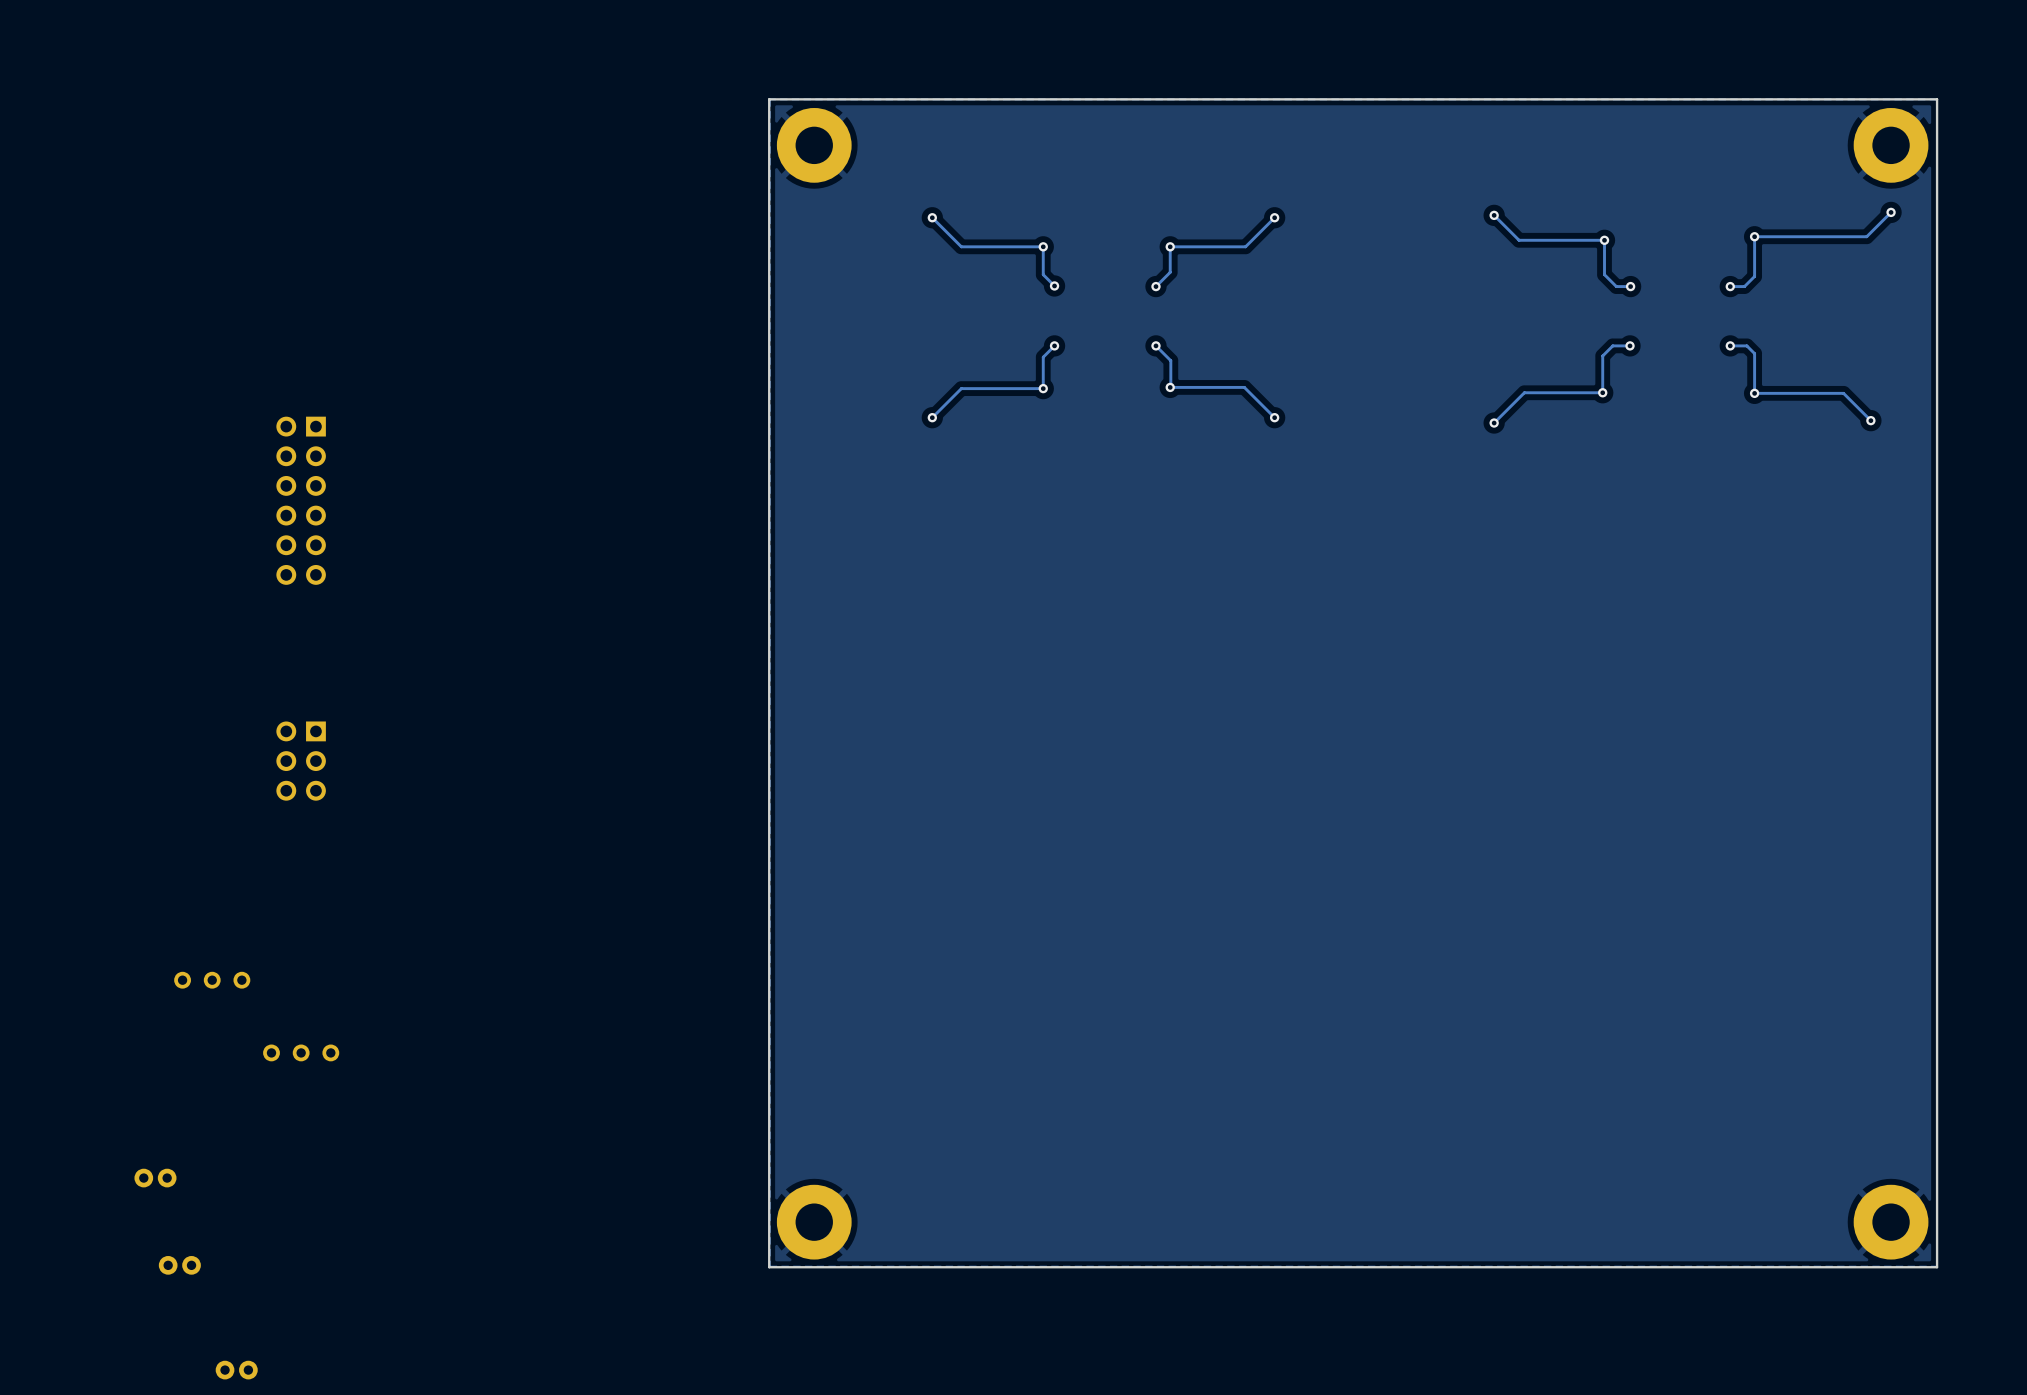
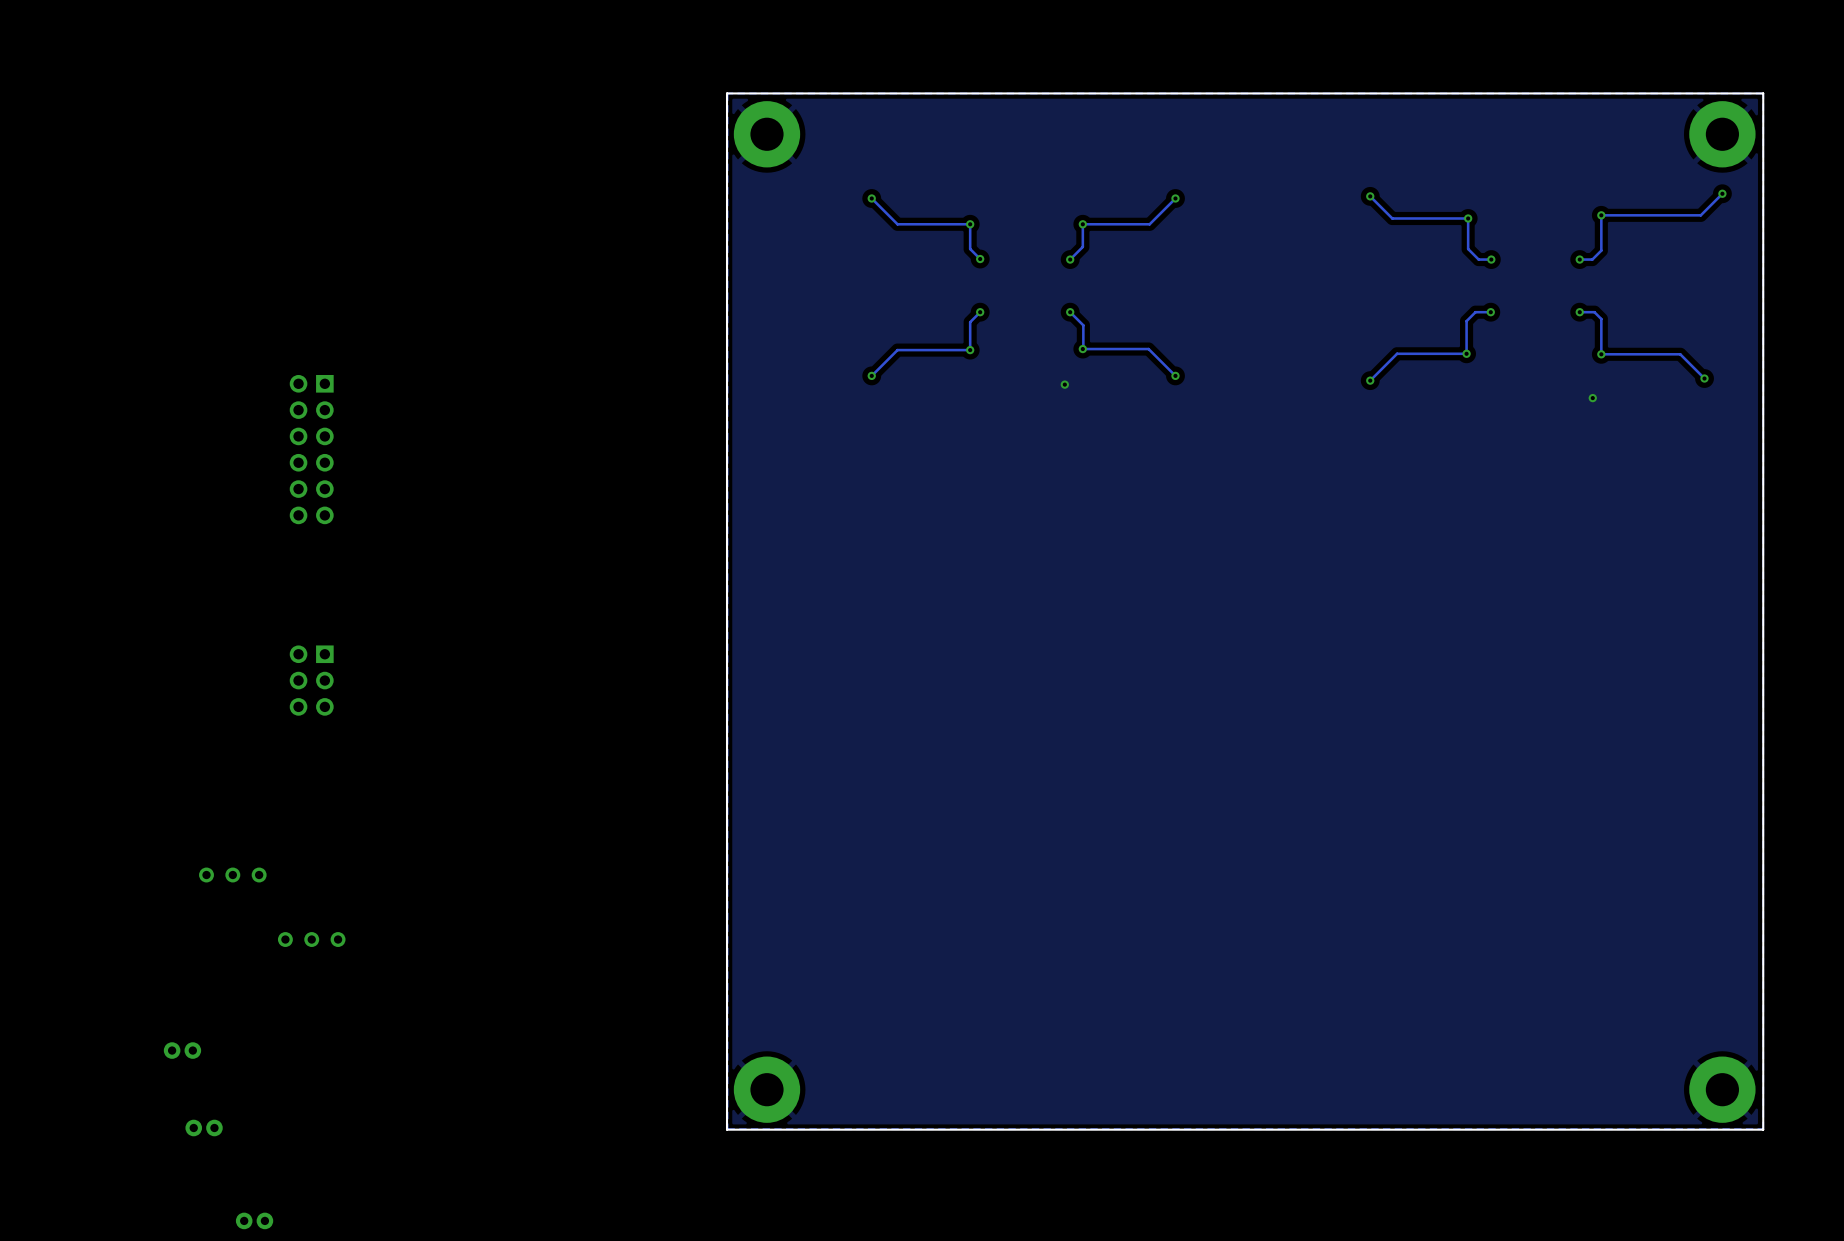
via: none -> (1064, 384)
via: none -> (1592, 398)

